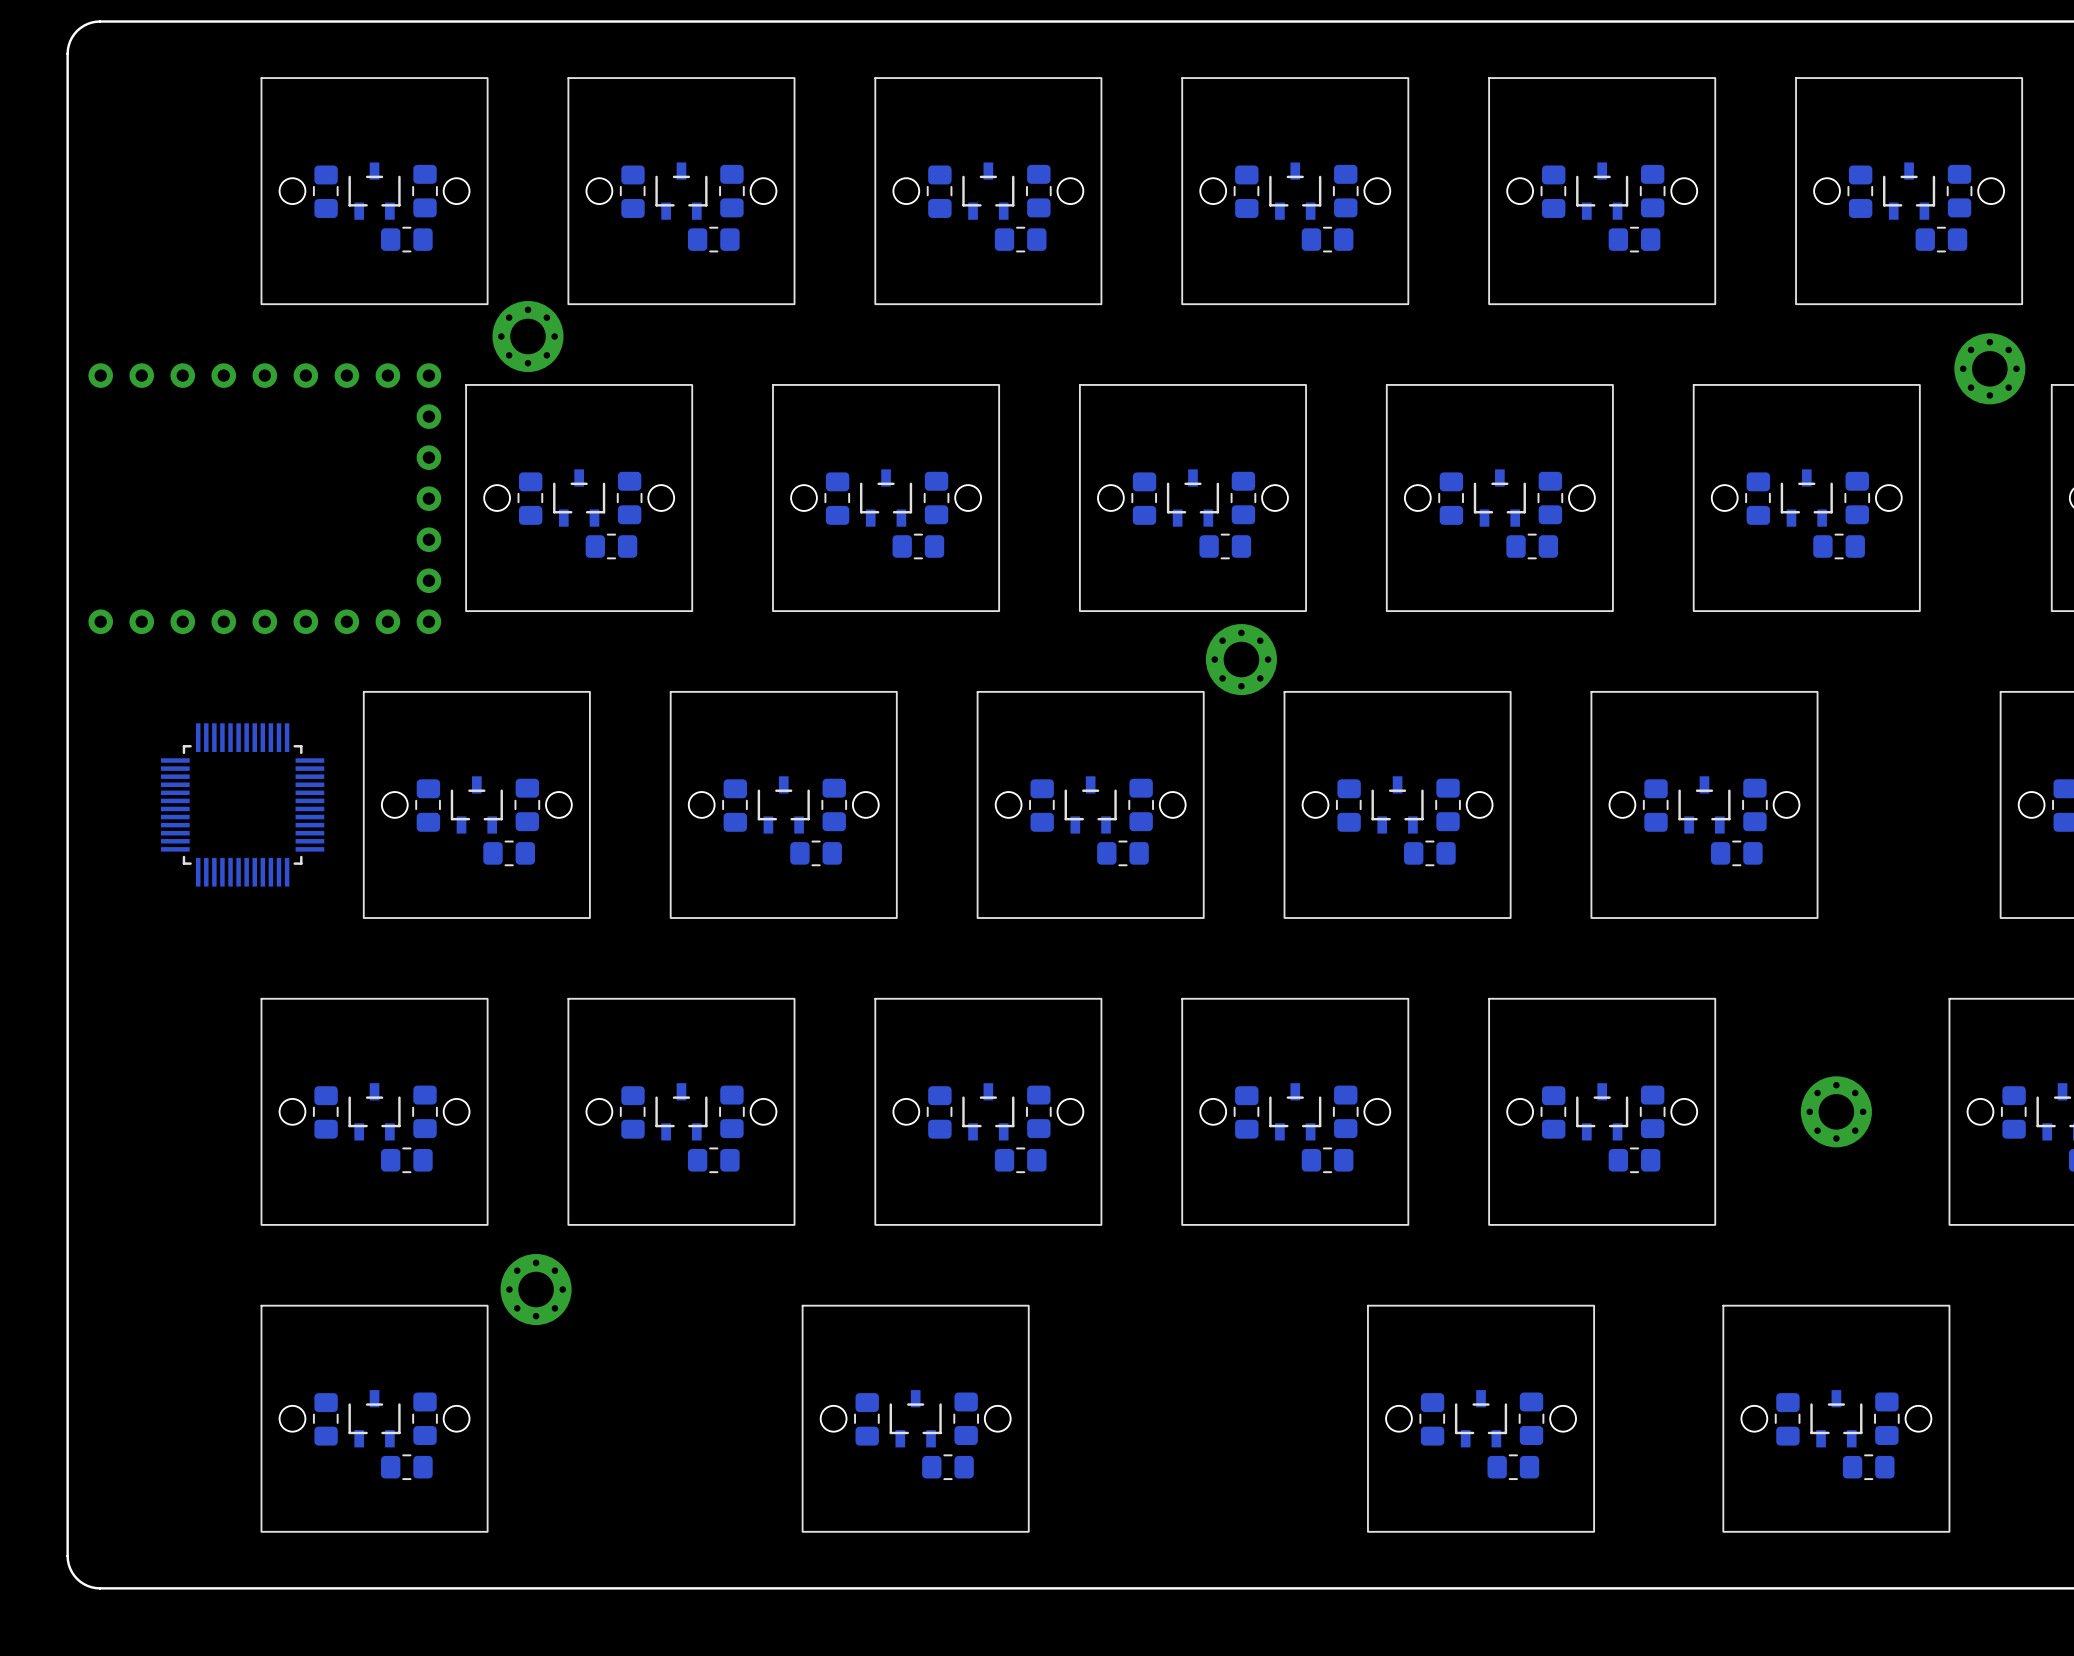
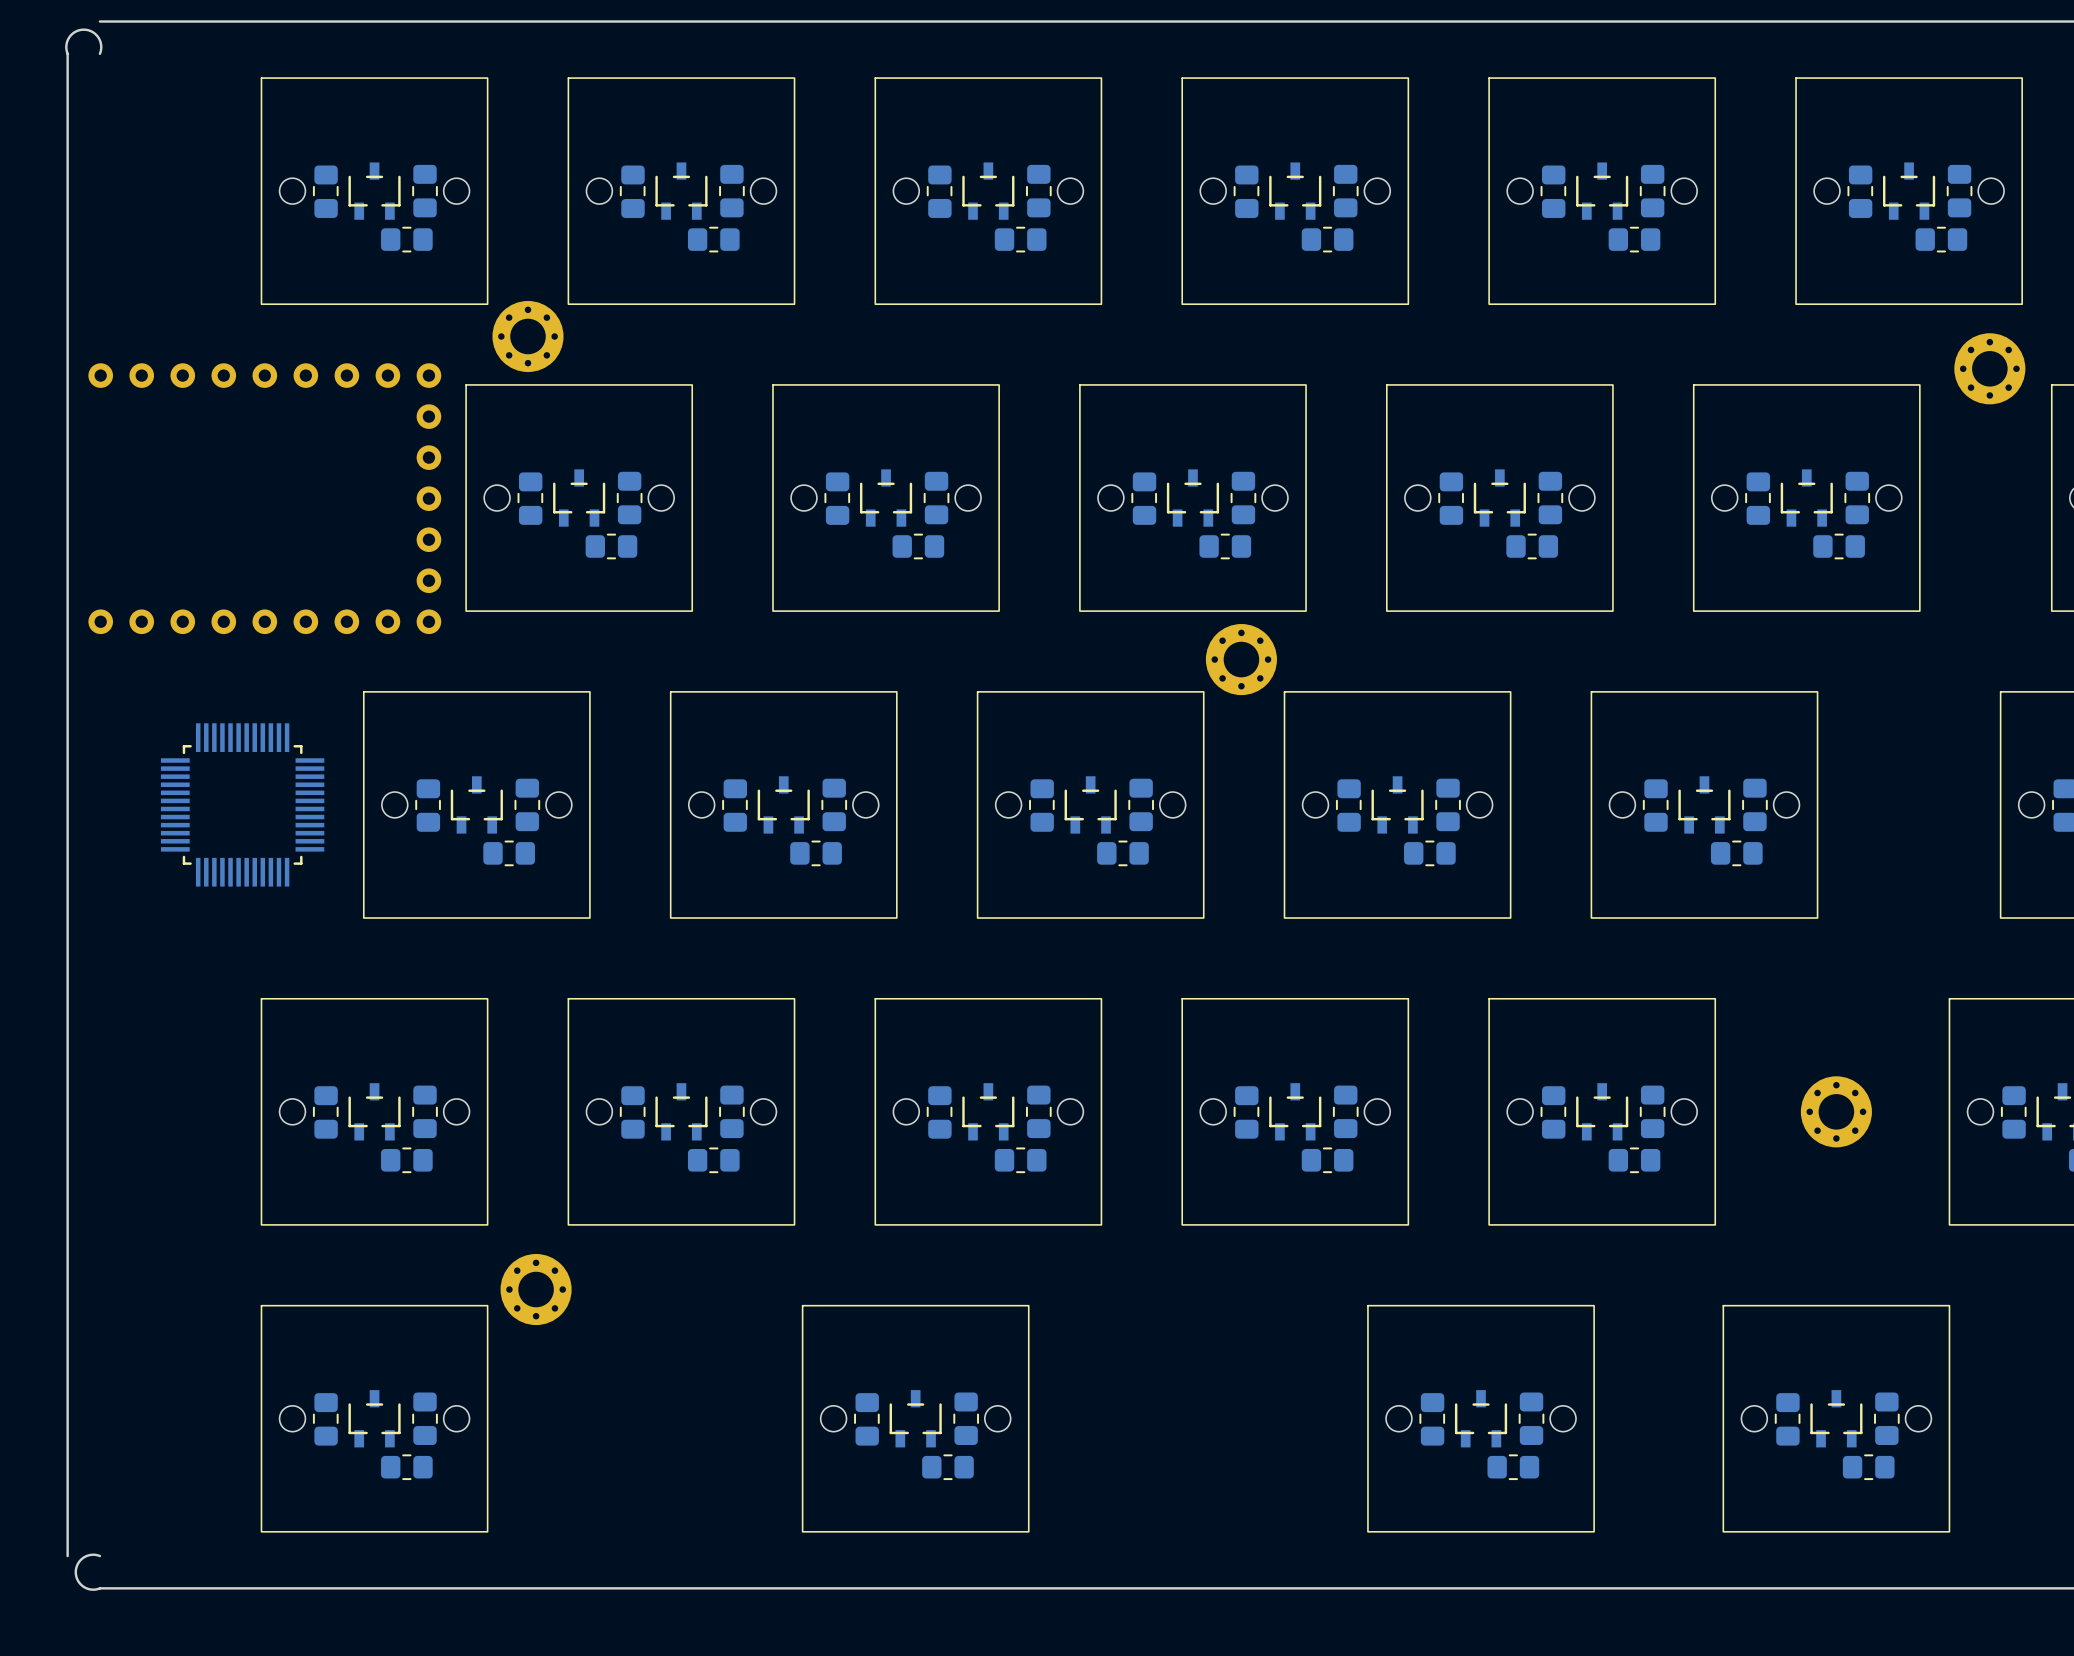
board edge: (99, 21) (87, 23) (77, 30) (70, 41) (67, 53) -> (99, 53) (101, 44) (97, 36) (90, 30) (83, 29) (75, 31) (68, 38) (66, 44) (67, 53)
board edge: (67, 1556) (70, 1568) (77, 1578) (87, 1585) (99, 1588) -> (99, 1556) (93, 1554) (84, 1557) (78, 1563) (75, 1572) (78, 1580) (84, 1587) (93, 1589) (99, 1588)

